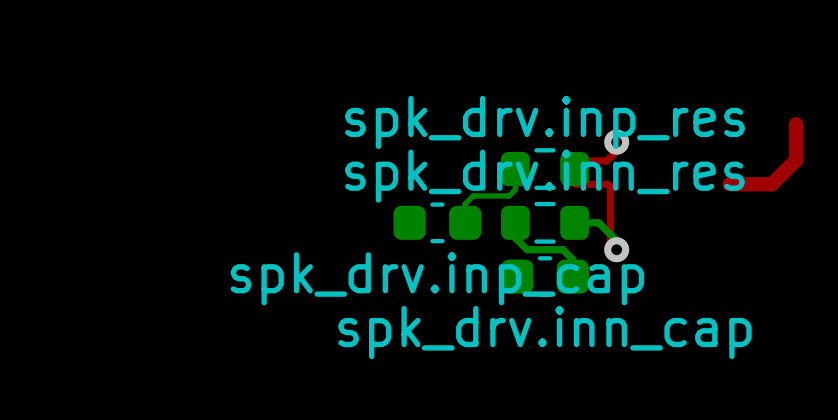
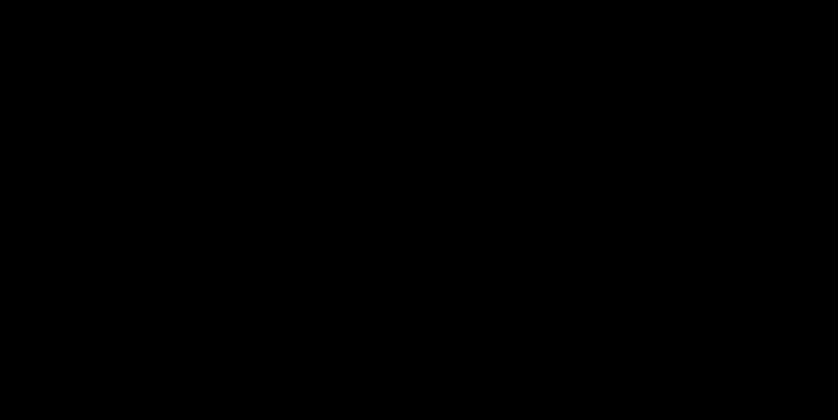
top track: (795, 124) (795, 160) (771, 184) (729, 184) -> none
top track: (616, 142) (616, 151) (606, 160) (575, 160) -> none
via: (616, 142) -> none
bottom track: (515, 169) (515, 189) (509, 195) (473, 195) (465, 204) (465, 222) -> none
spk_drv.inp_res: (544, 169) -> none
top track: (575, 184) (607, 184) (610, 186) (610, 243) (616, 249) -> none
spk_drv.inp_cap: (437, 222) -> none
bottom track: (515, 222) (515, 238) (527, 249) (562, 249) (572, 259) (572, 276) -> none
spk_drv.inn_res: (544, 222) -> none
bottom track: (574, 222) (598, 222) (616, 240) (616, 249) -> none
via: (616, 249) -> none
spk_drv.inn_cap: (544, 276) -> none

